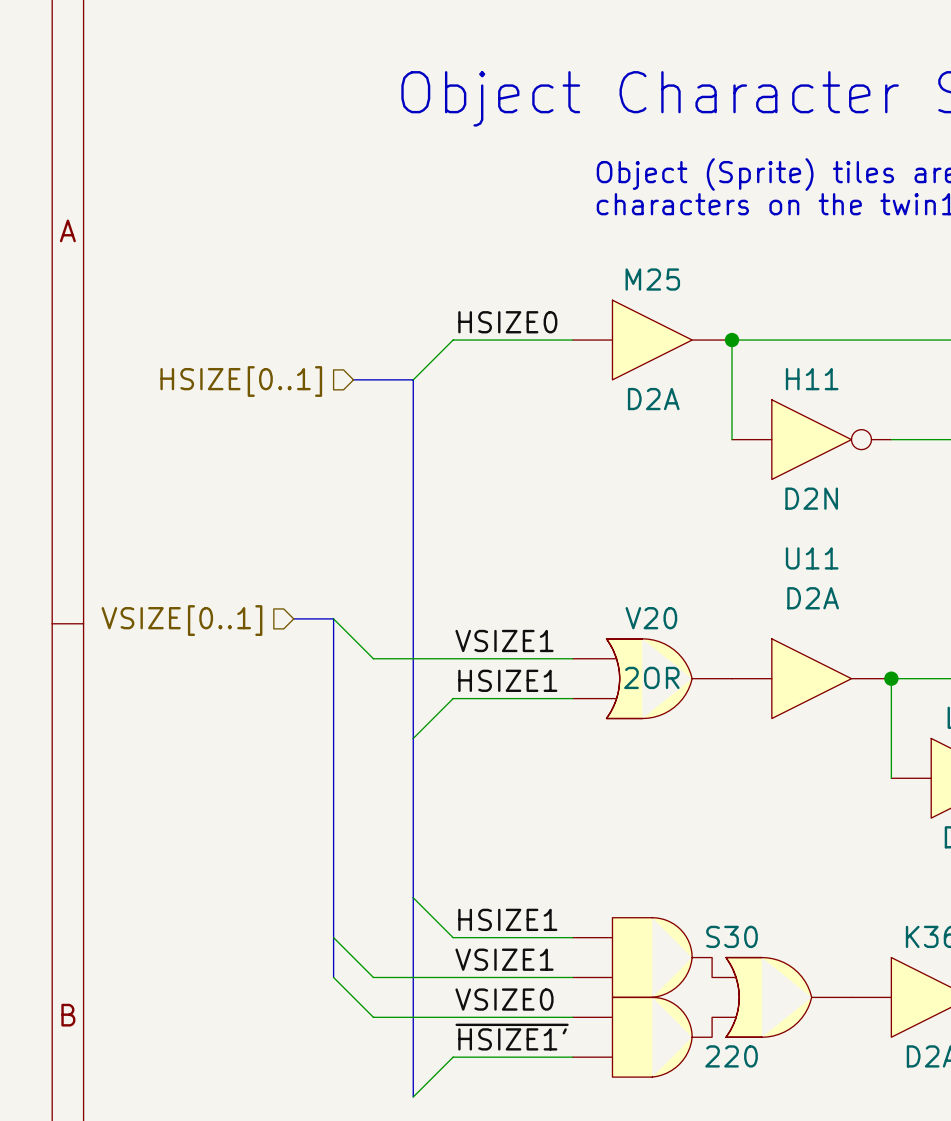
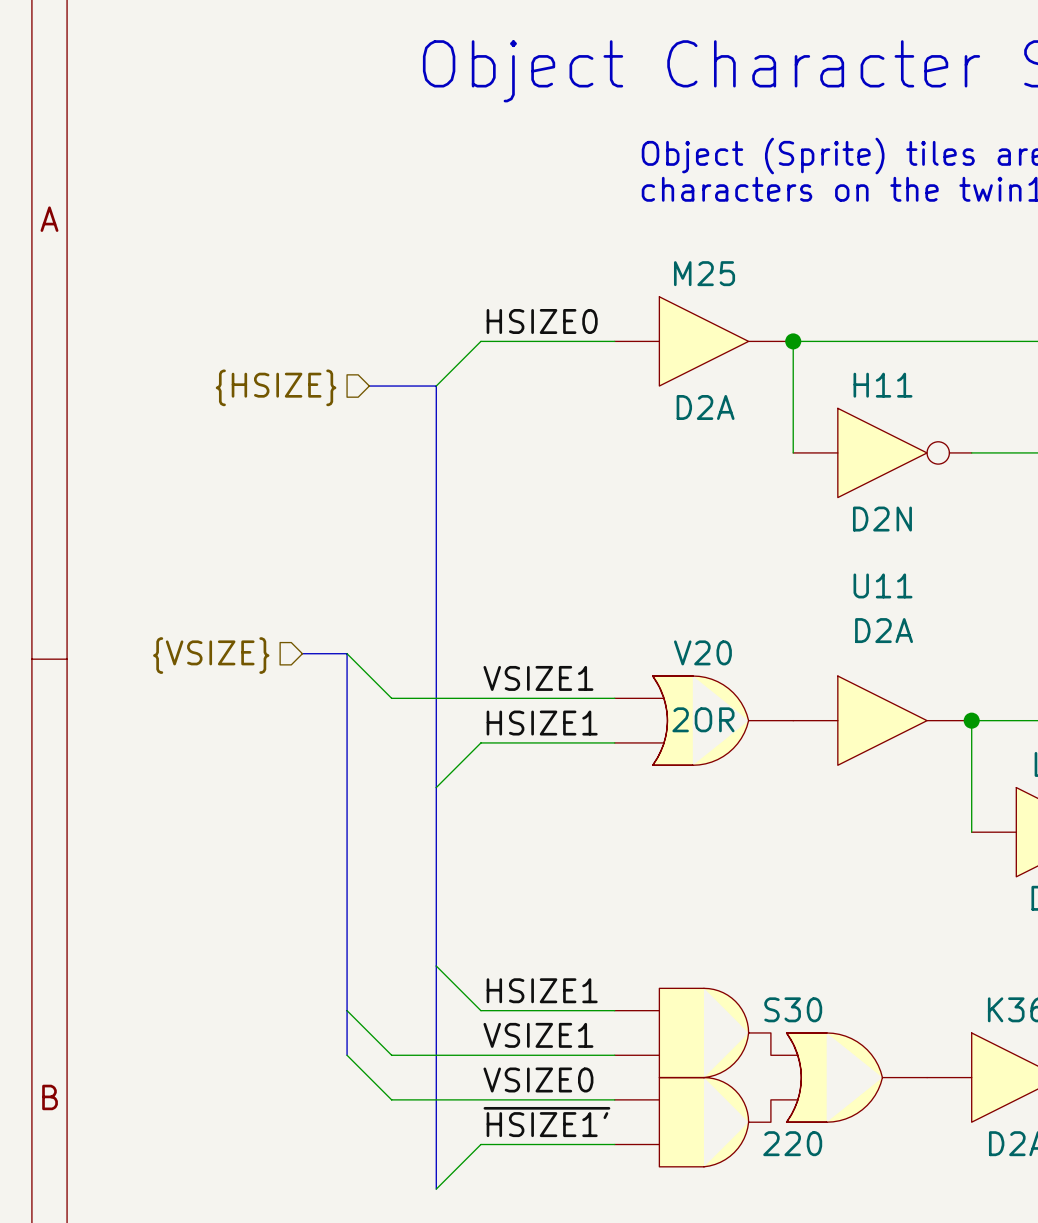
hierarchical label: HSIZE[0..1] (241, 381) -> {HSIZE} (276, 387)
hierarchical label: VSIZE[0..1] (181, 620) -> {VSIZE} (211, 655)

